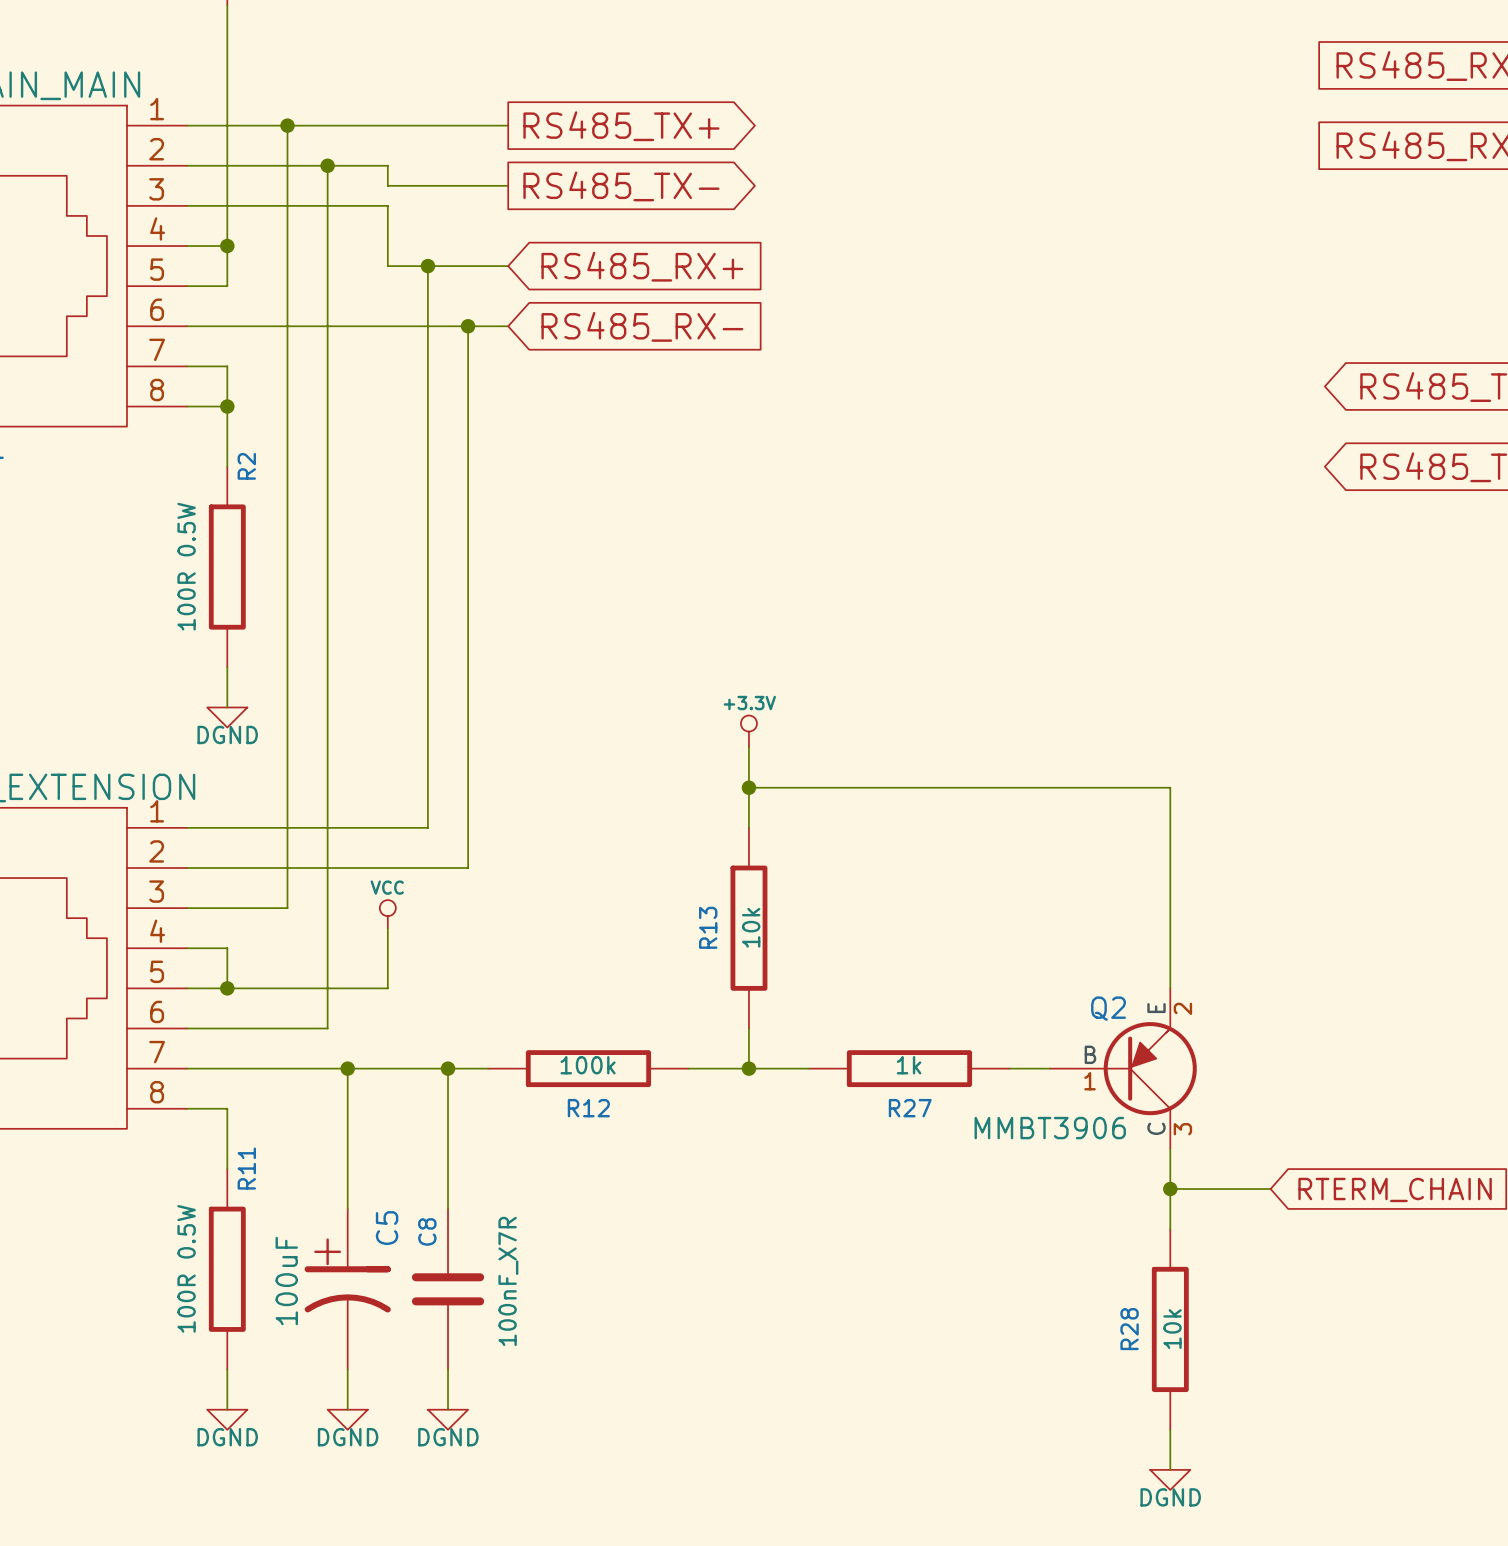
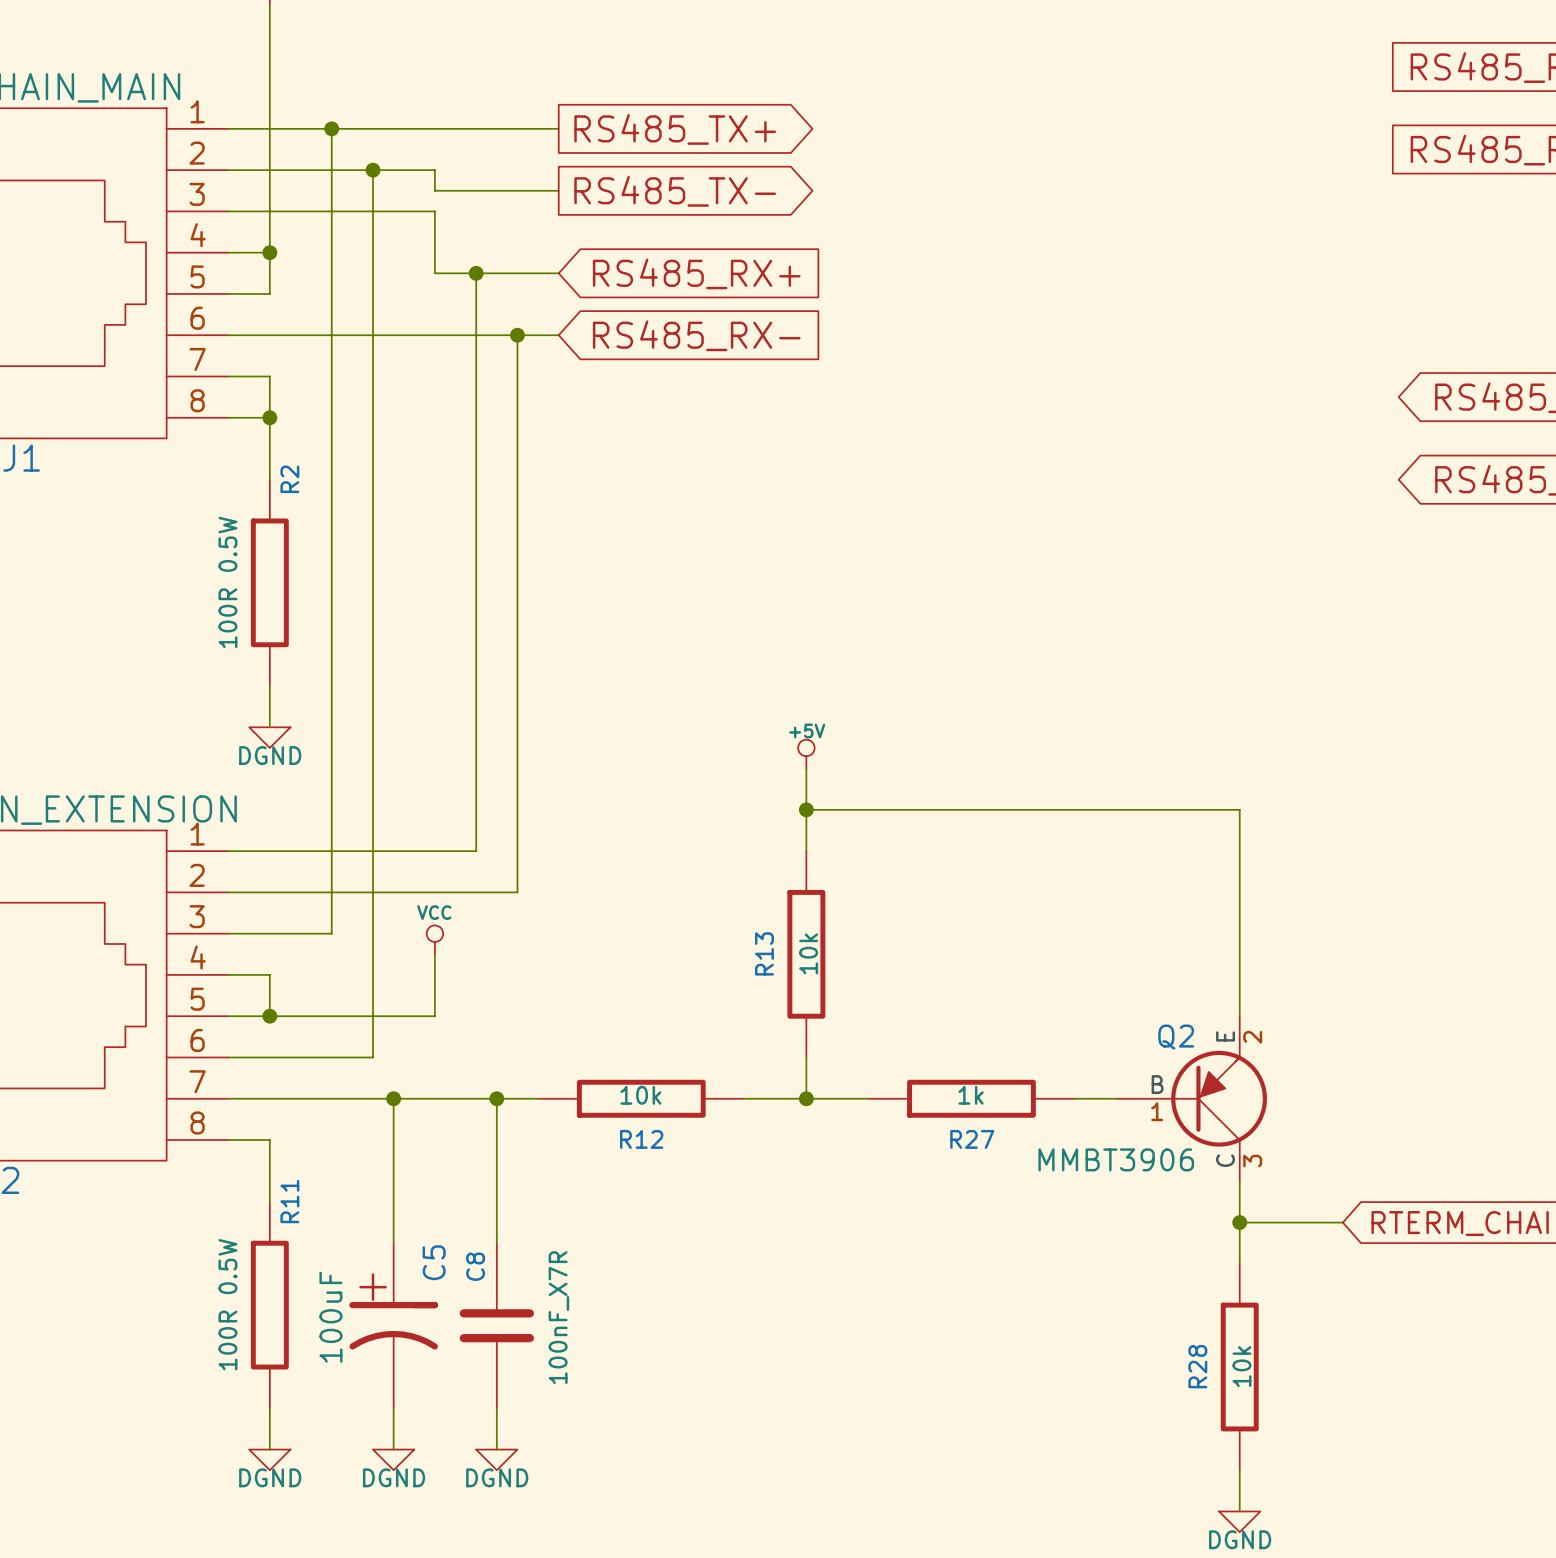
power symbol: +3.3V (748, 731) -> +5V (806, 754)
R12 value: 100k (588, 1065) -> 10k (640, 1095)

